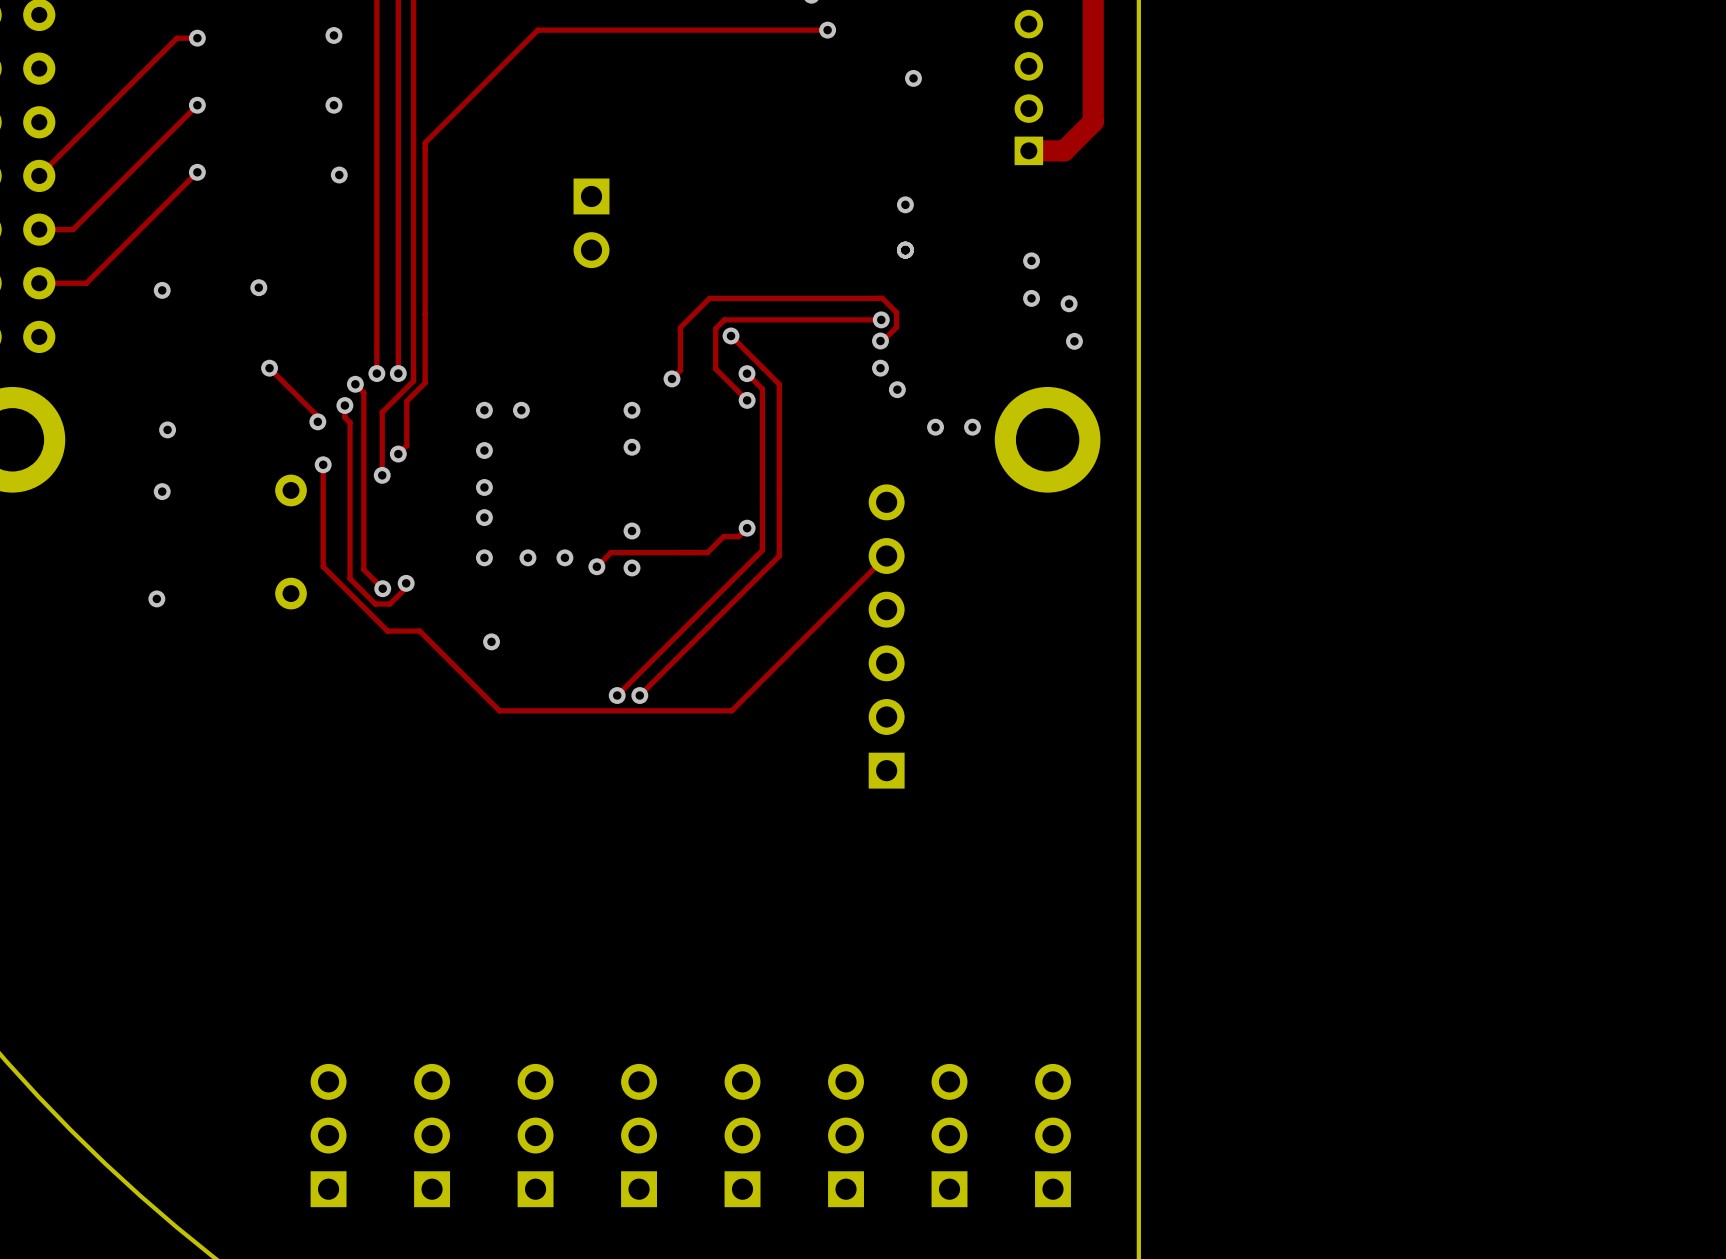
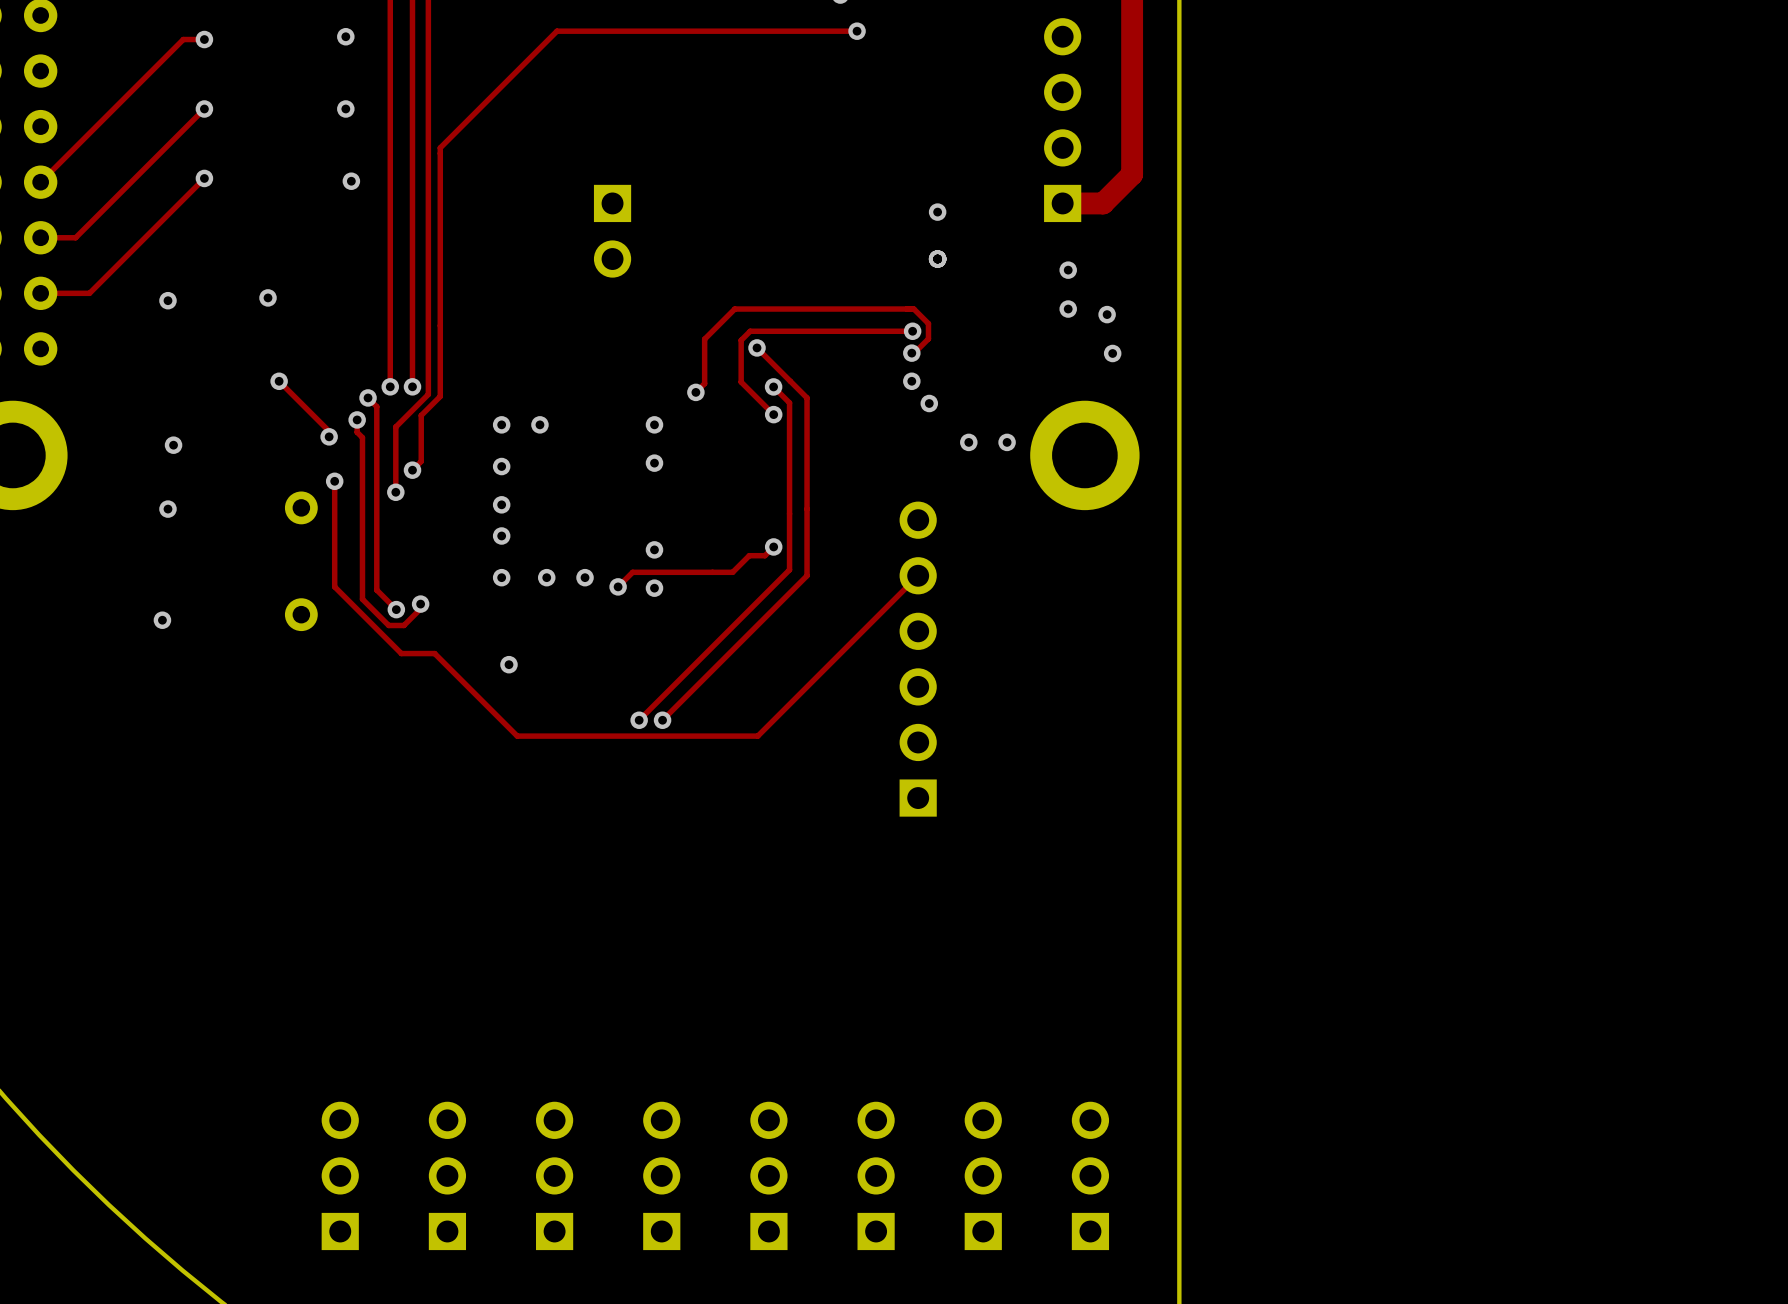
via: (913, 78) -> none
part: (1028, 87) -> none
part: none -> (1062, 120)
track: (1093, 121) (1064, 150) (1028, 150) -> (1132, 126) (1132, 174) (1103, 203) (1062, 203)

